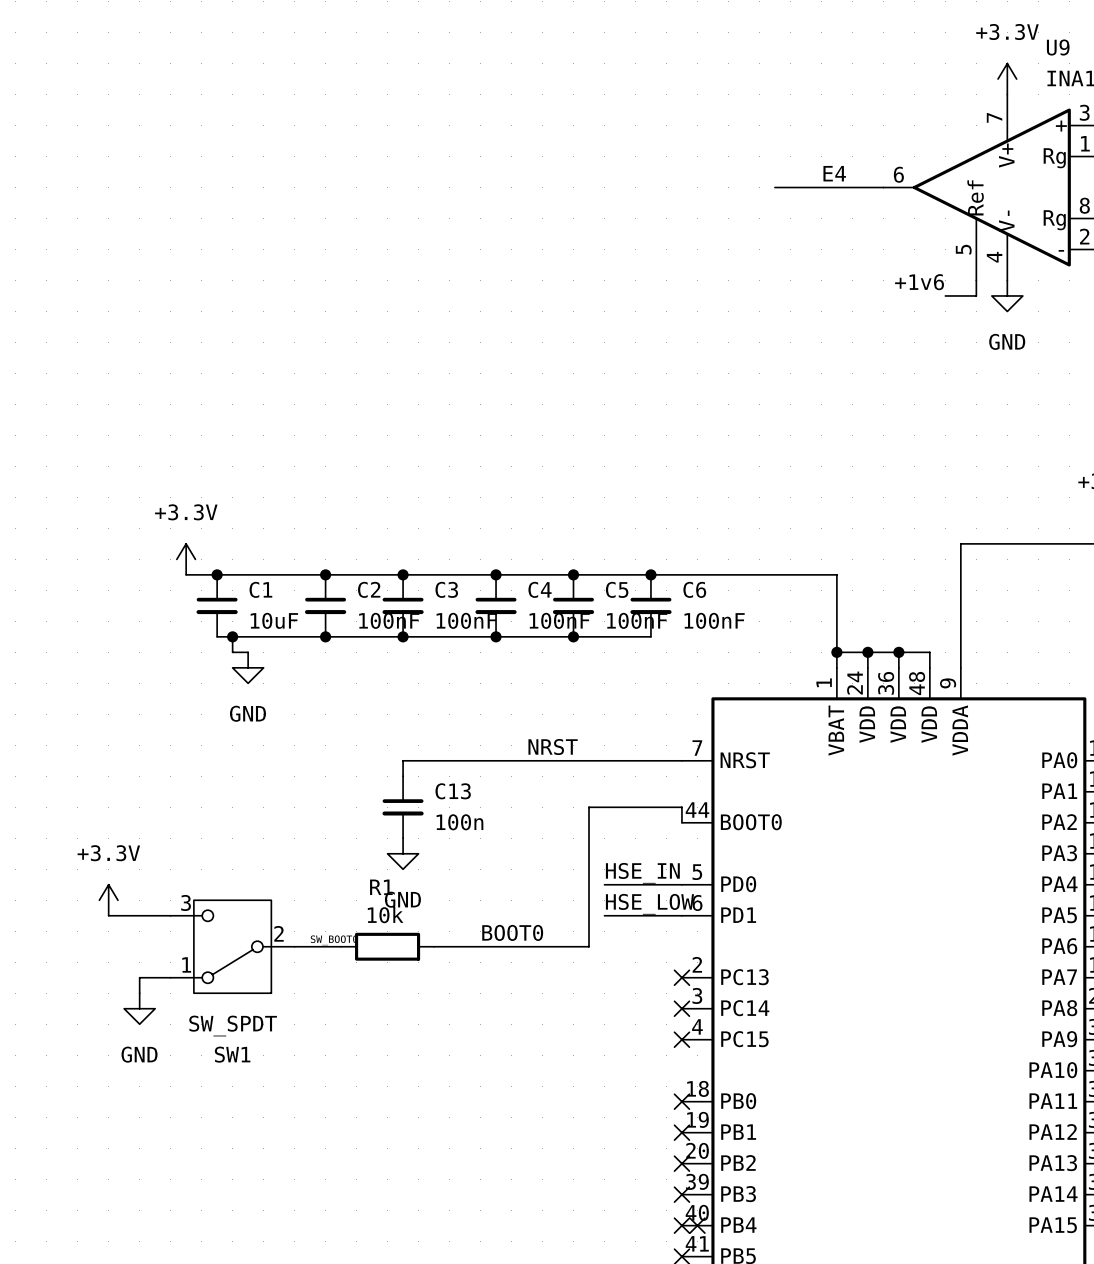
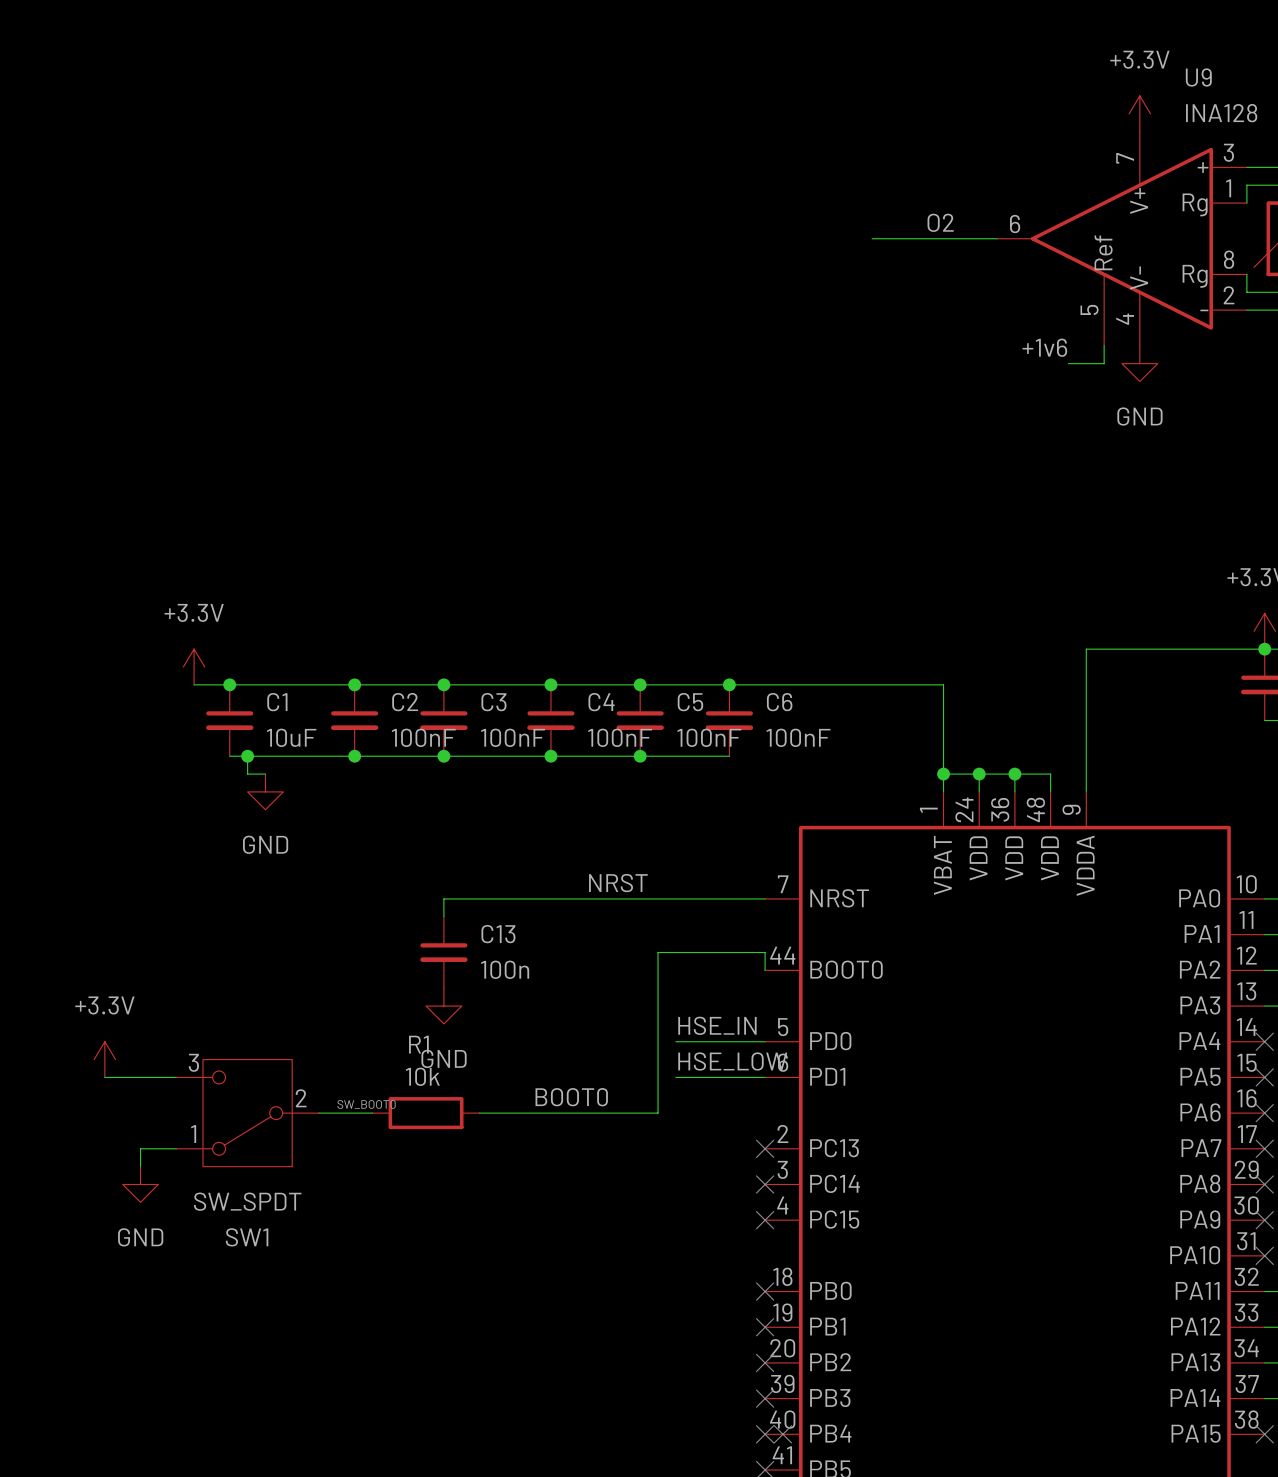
label: E4 (834, 173) -> O2 (940, 222)

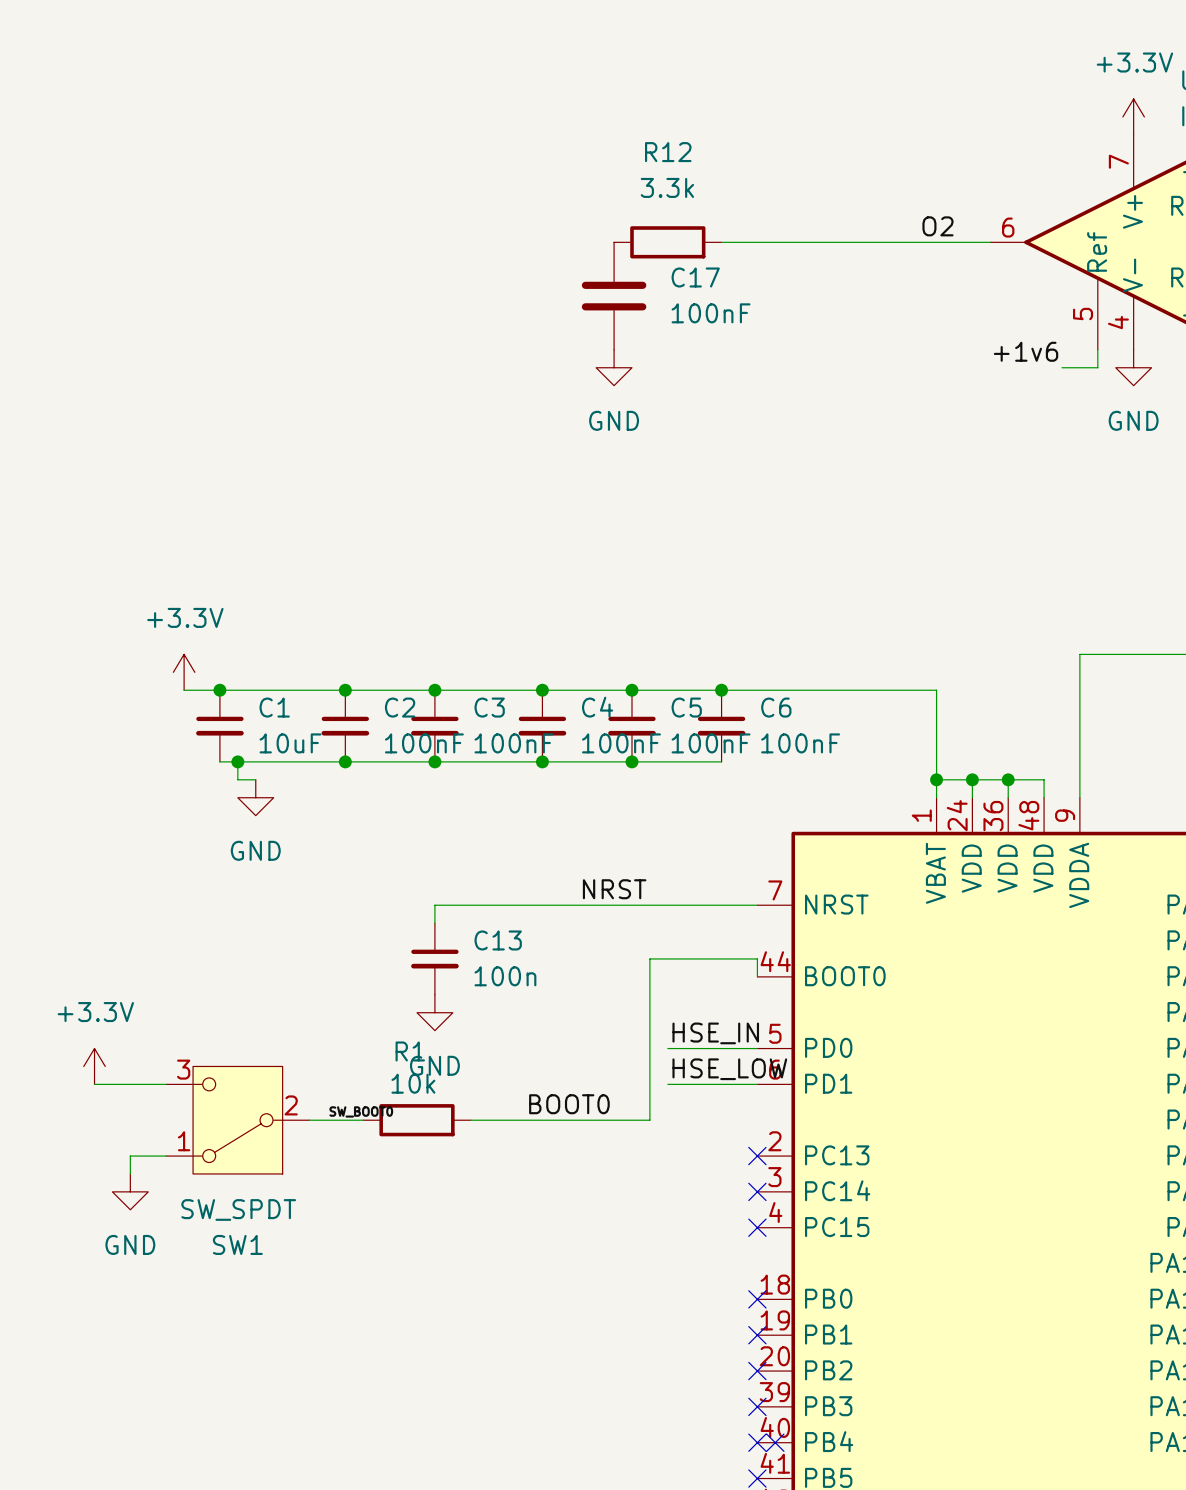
R12: none -> 3.3k (667, 242)
wire: none -> (721, 242) (864, 242)
C17: none -> 100nF (614, 296)
power symbol: none -> GND (614, 367)

